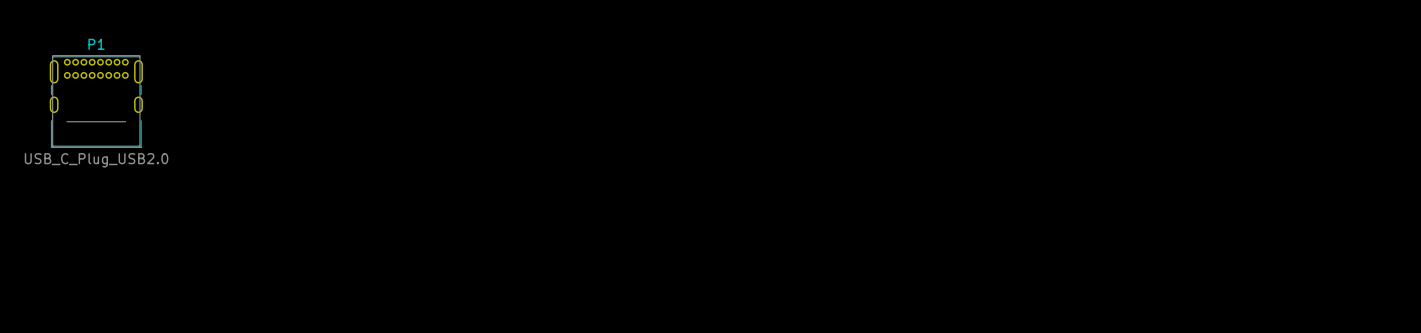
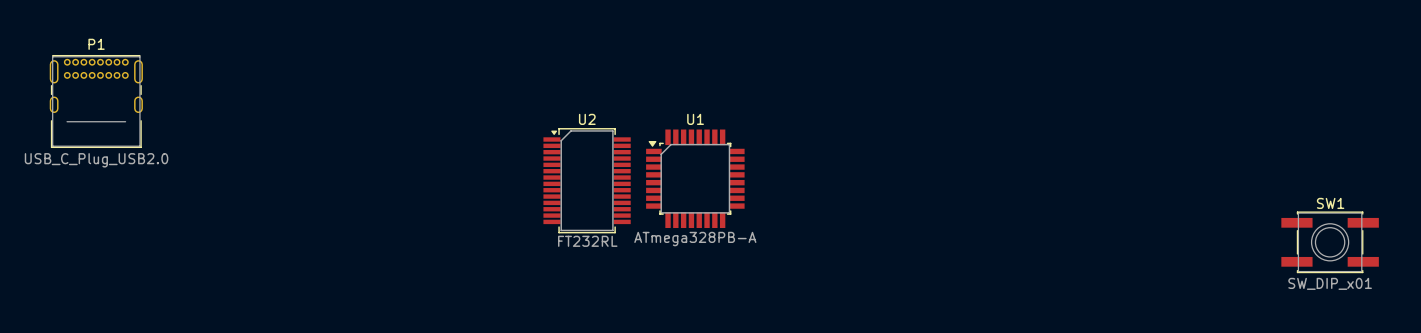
U1: none -> ATmega328PB-A (695, 178)
U2: none -> FT232RL (587, 180)
SW1: none -> SW_DIP_x01 (1330, 242)

